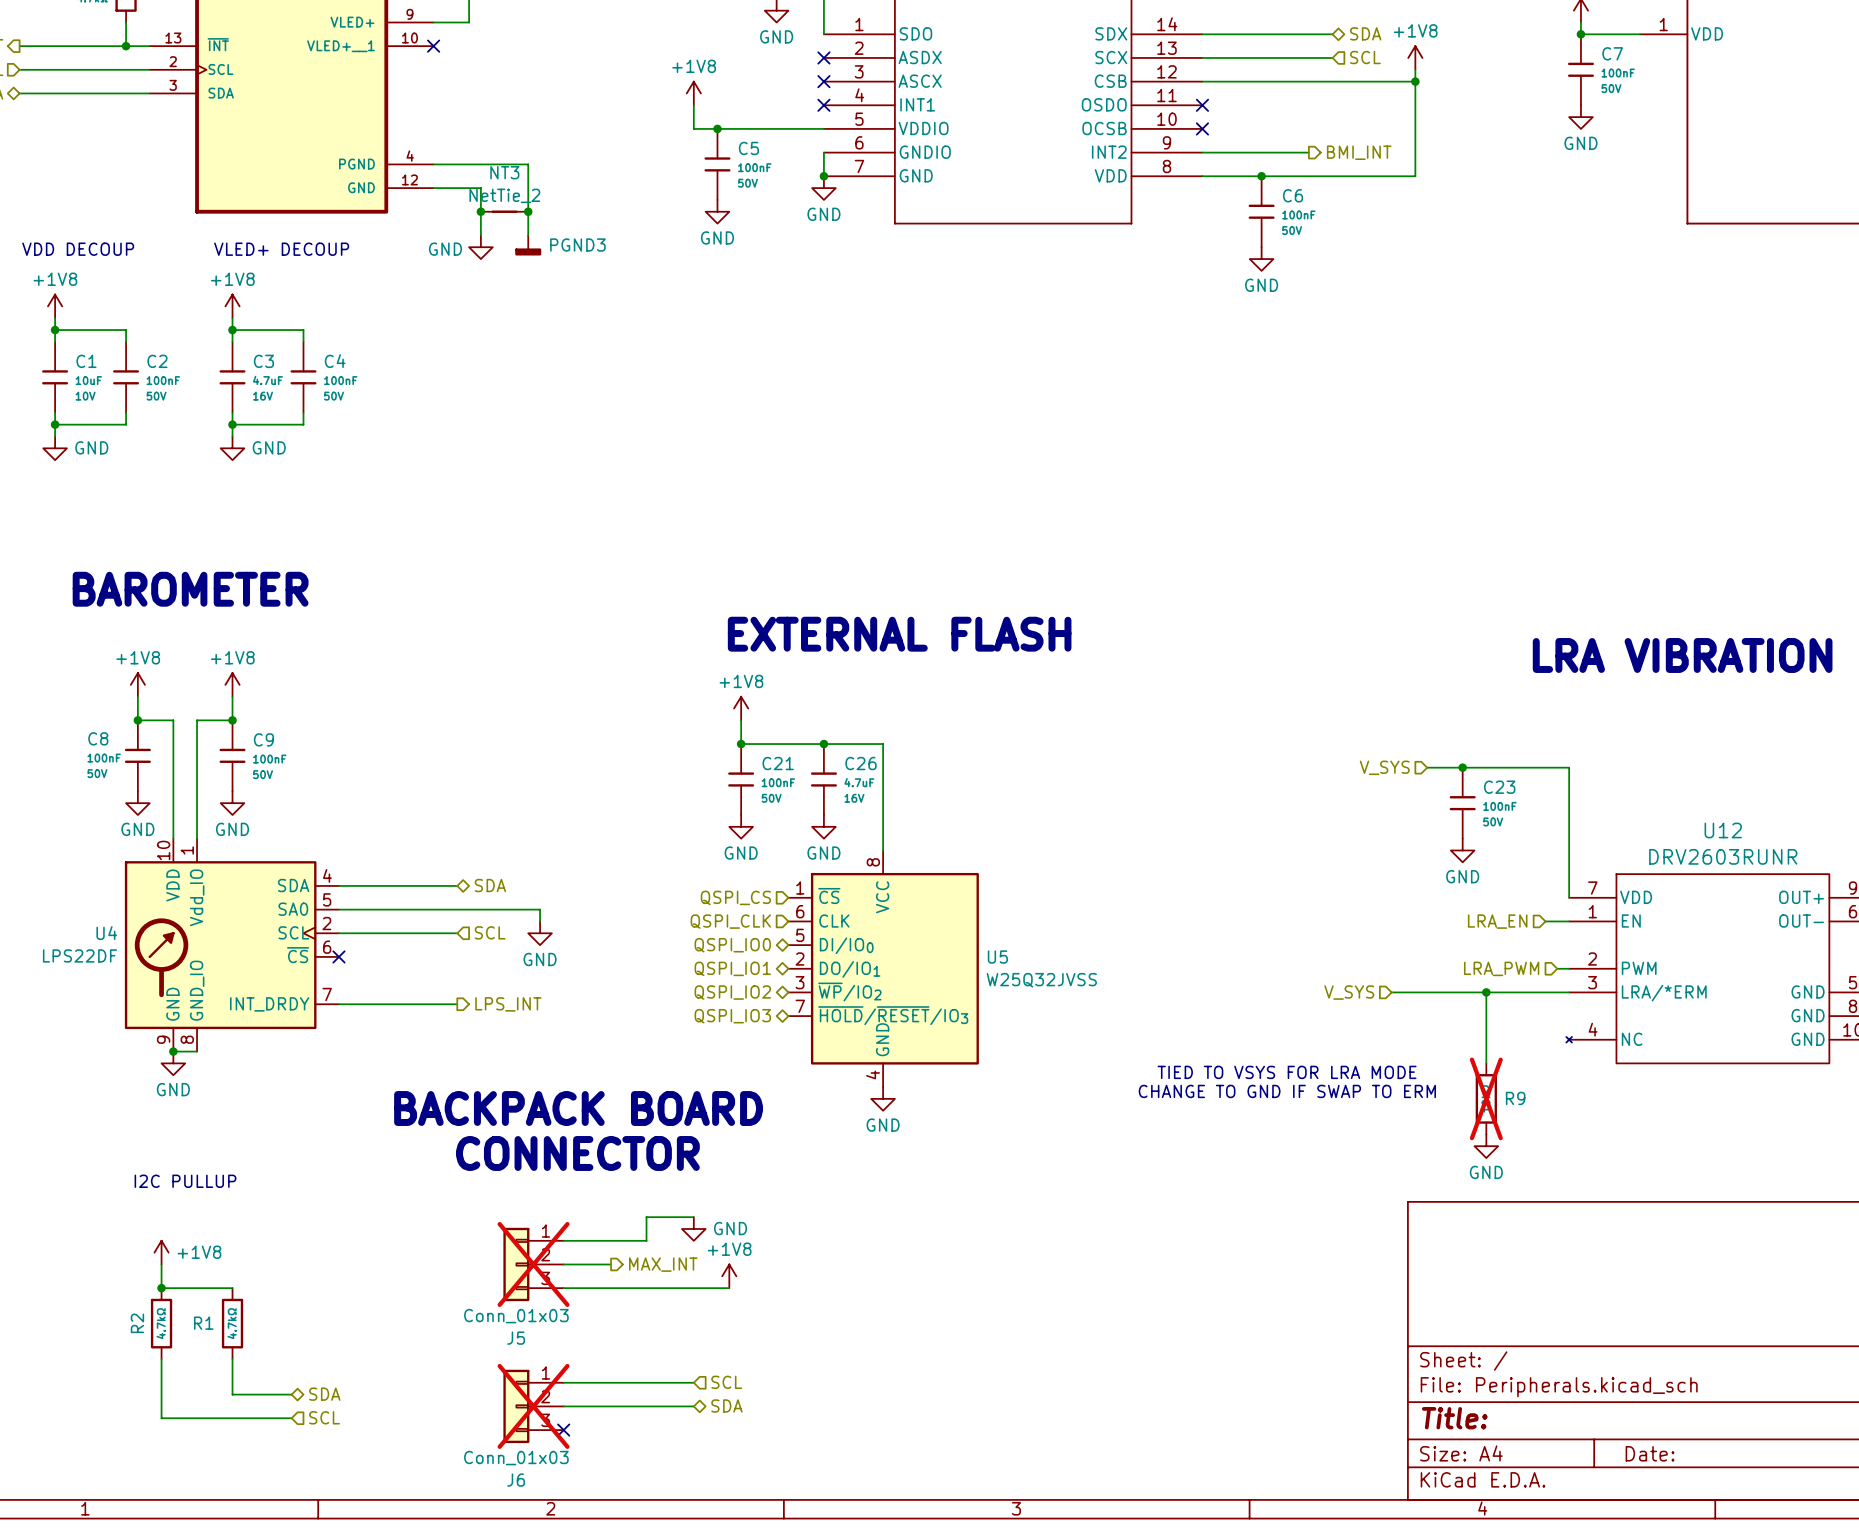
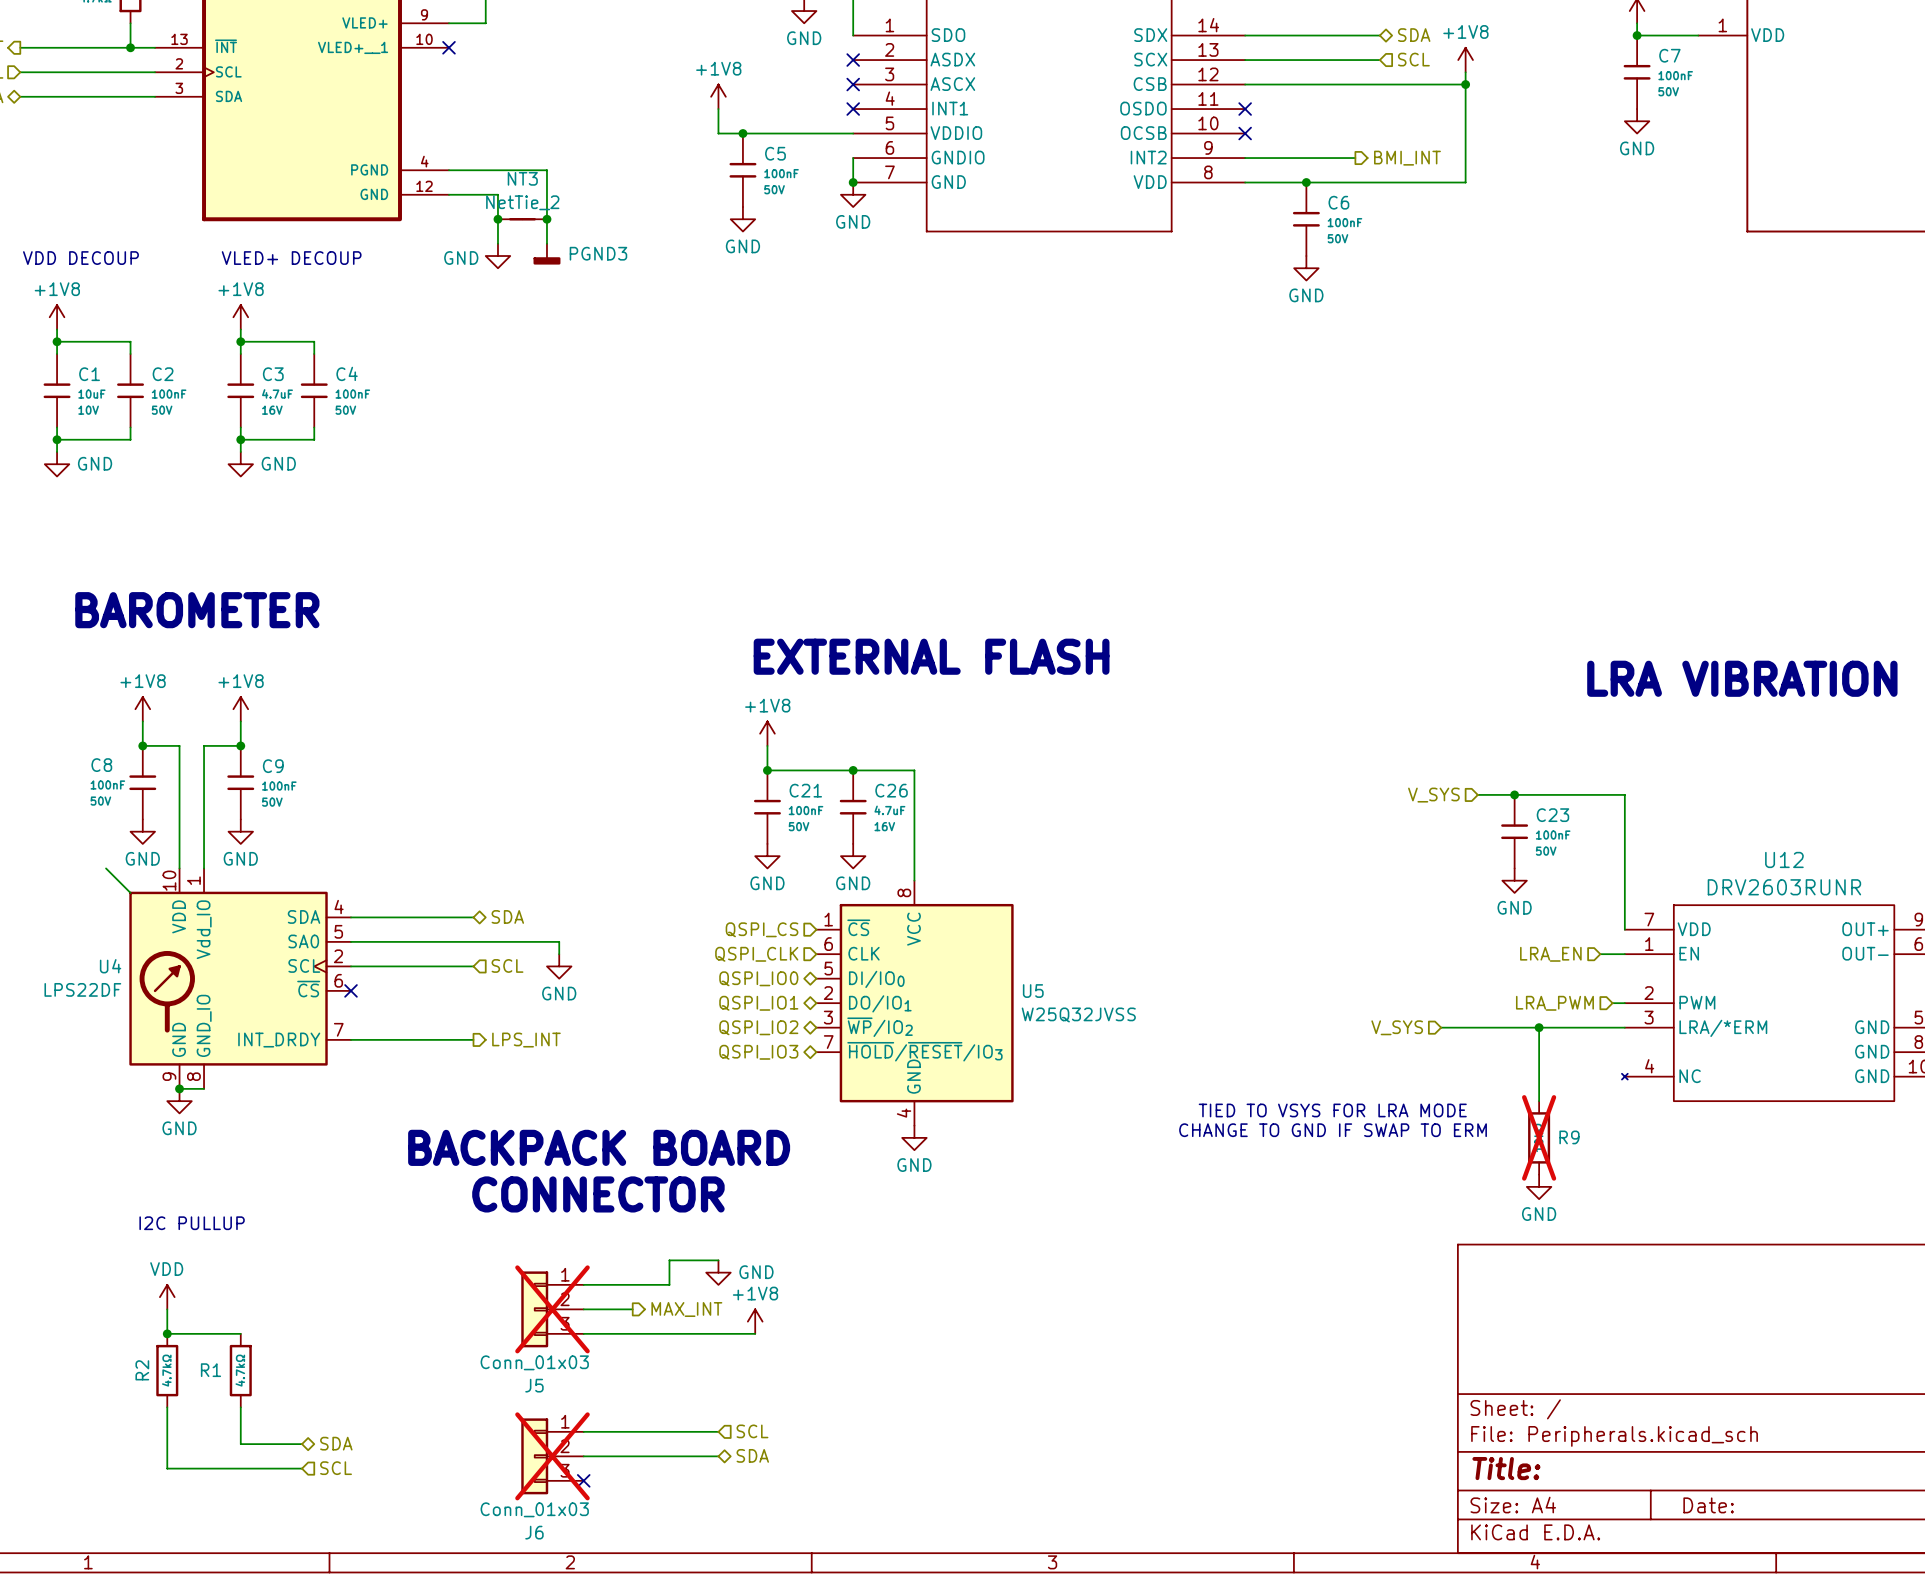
wire: none -> (106, 868) (130, 892)
power symbol: +1V8 (161, 1252) -> VDD (167, 1297)

